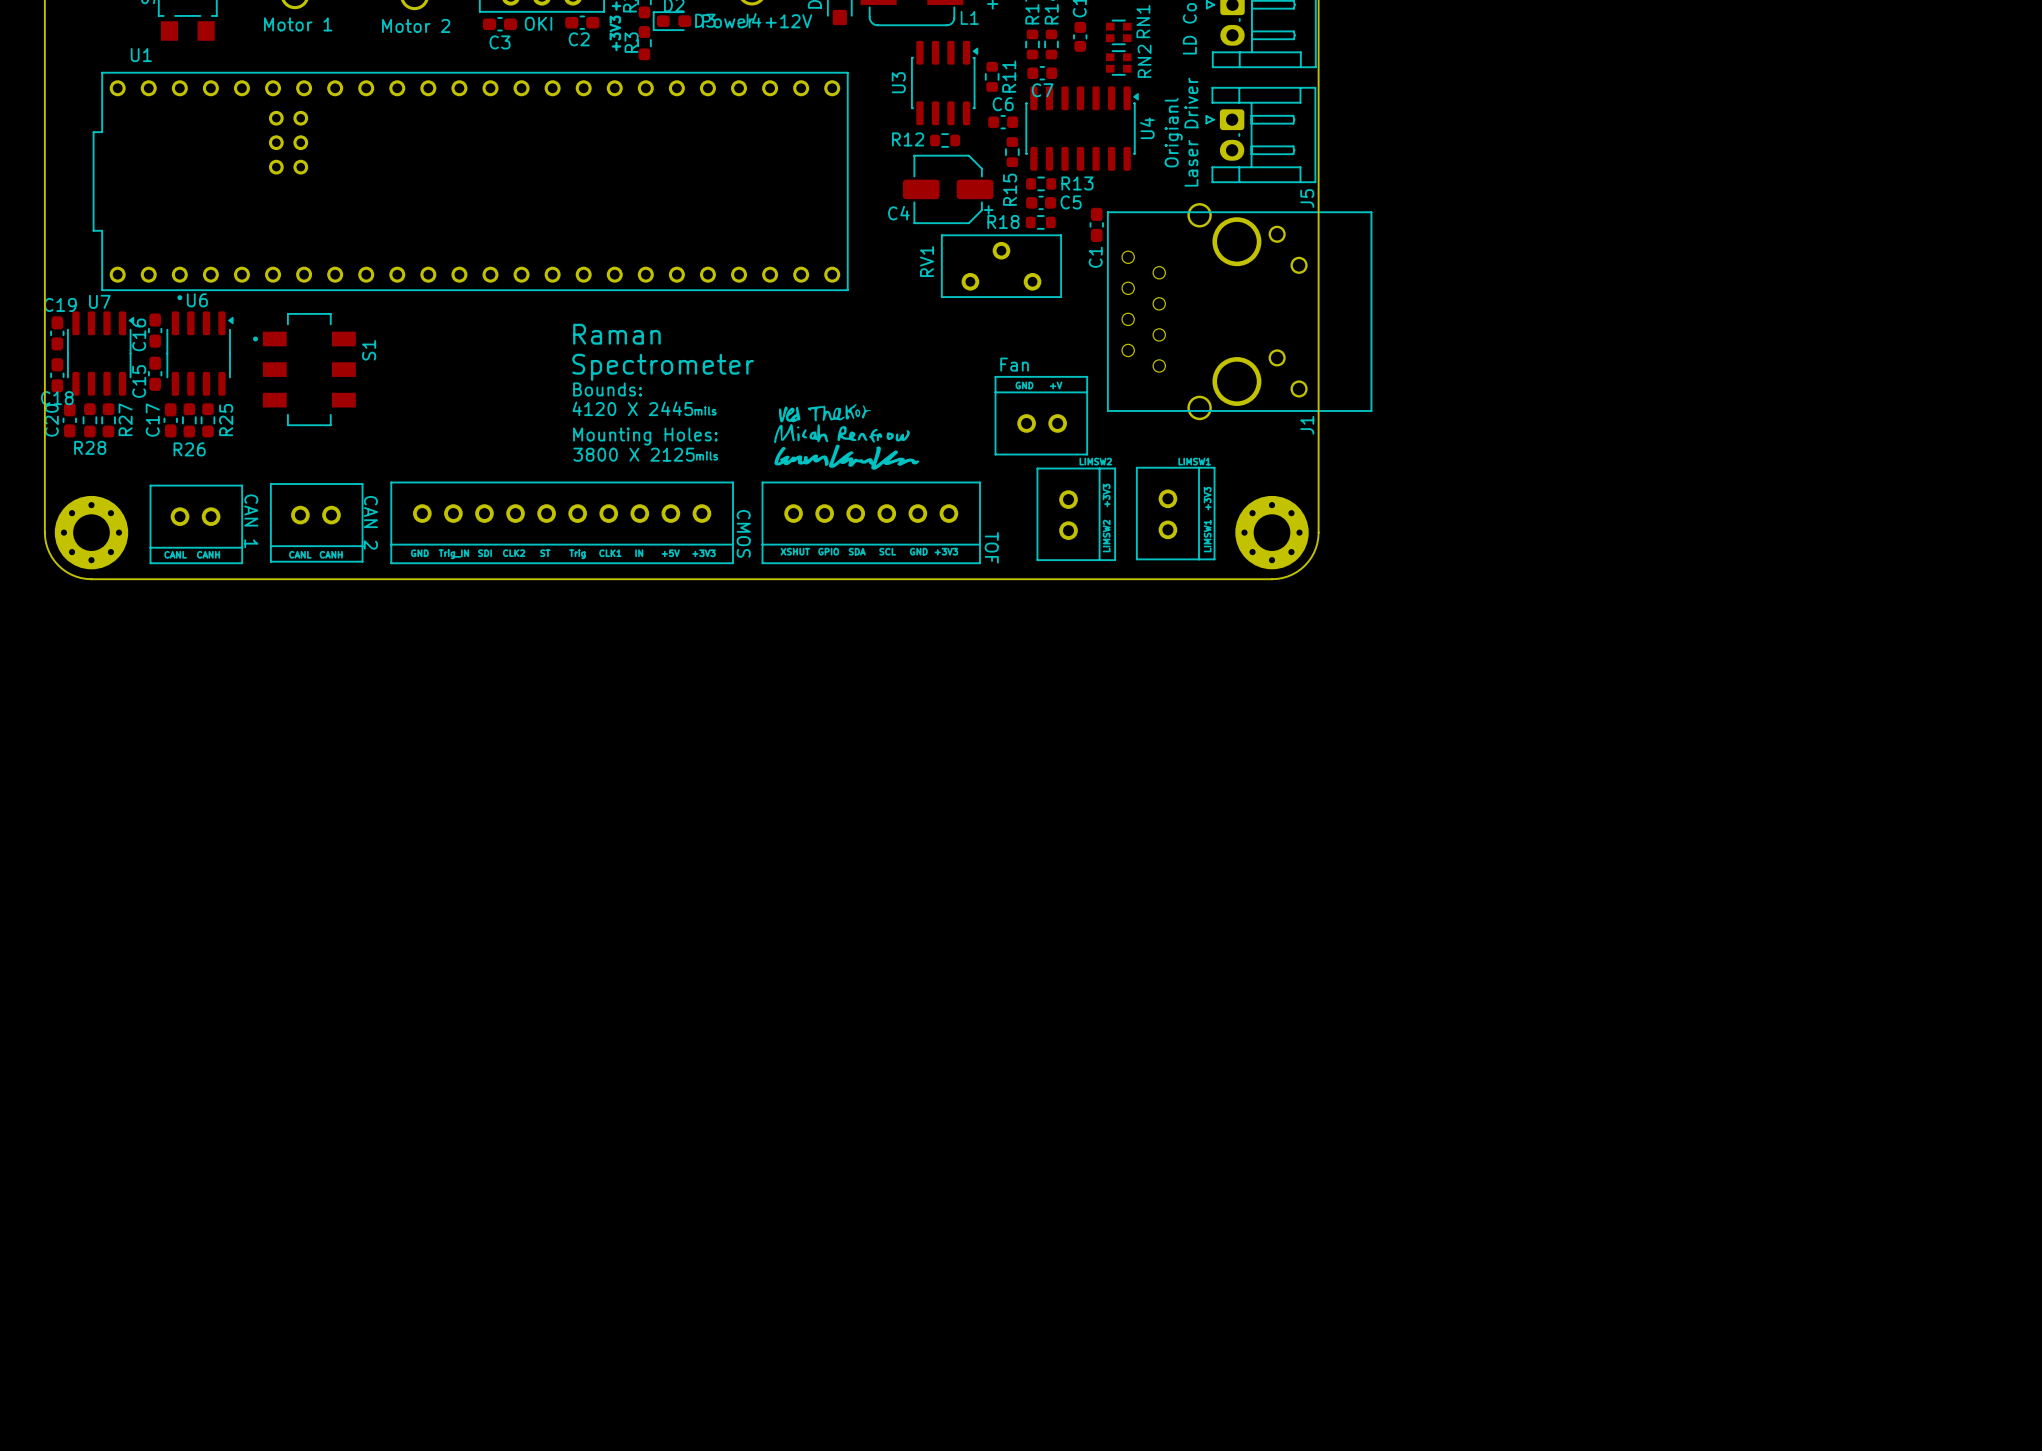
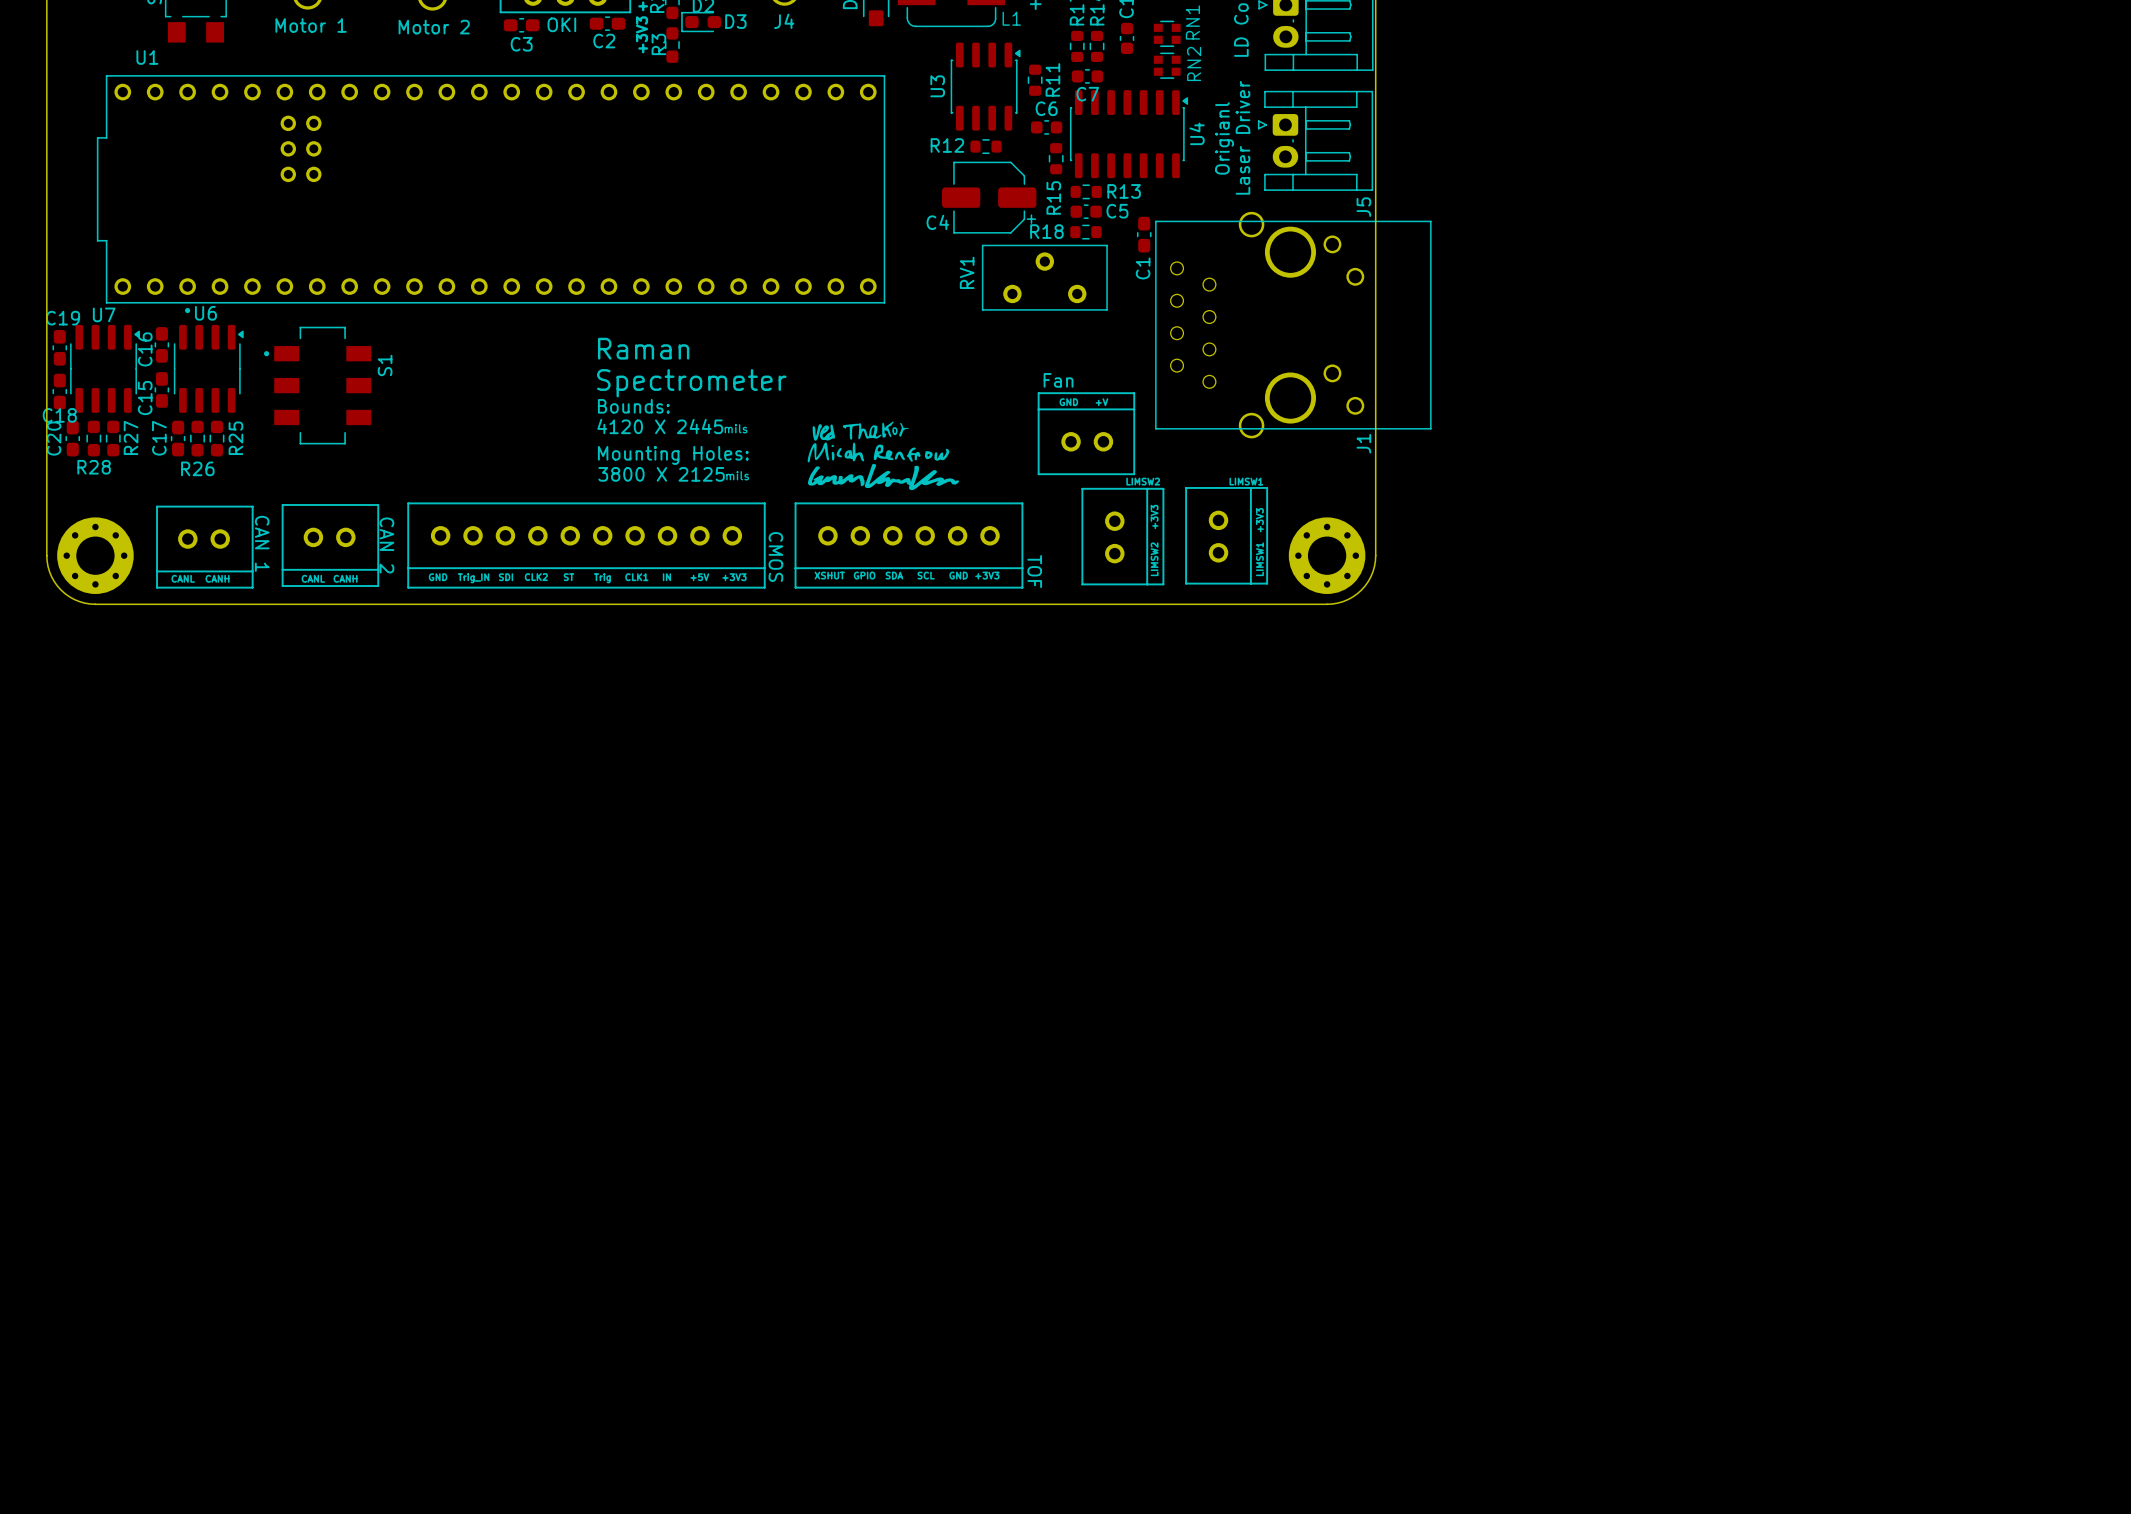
text: Power +12V (757, 21) -> none

